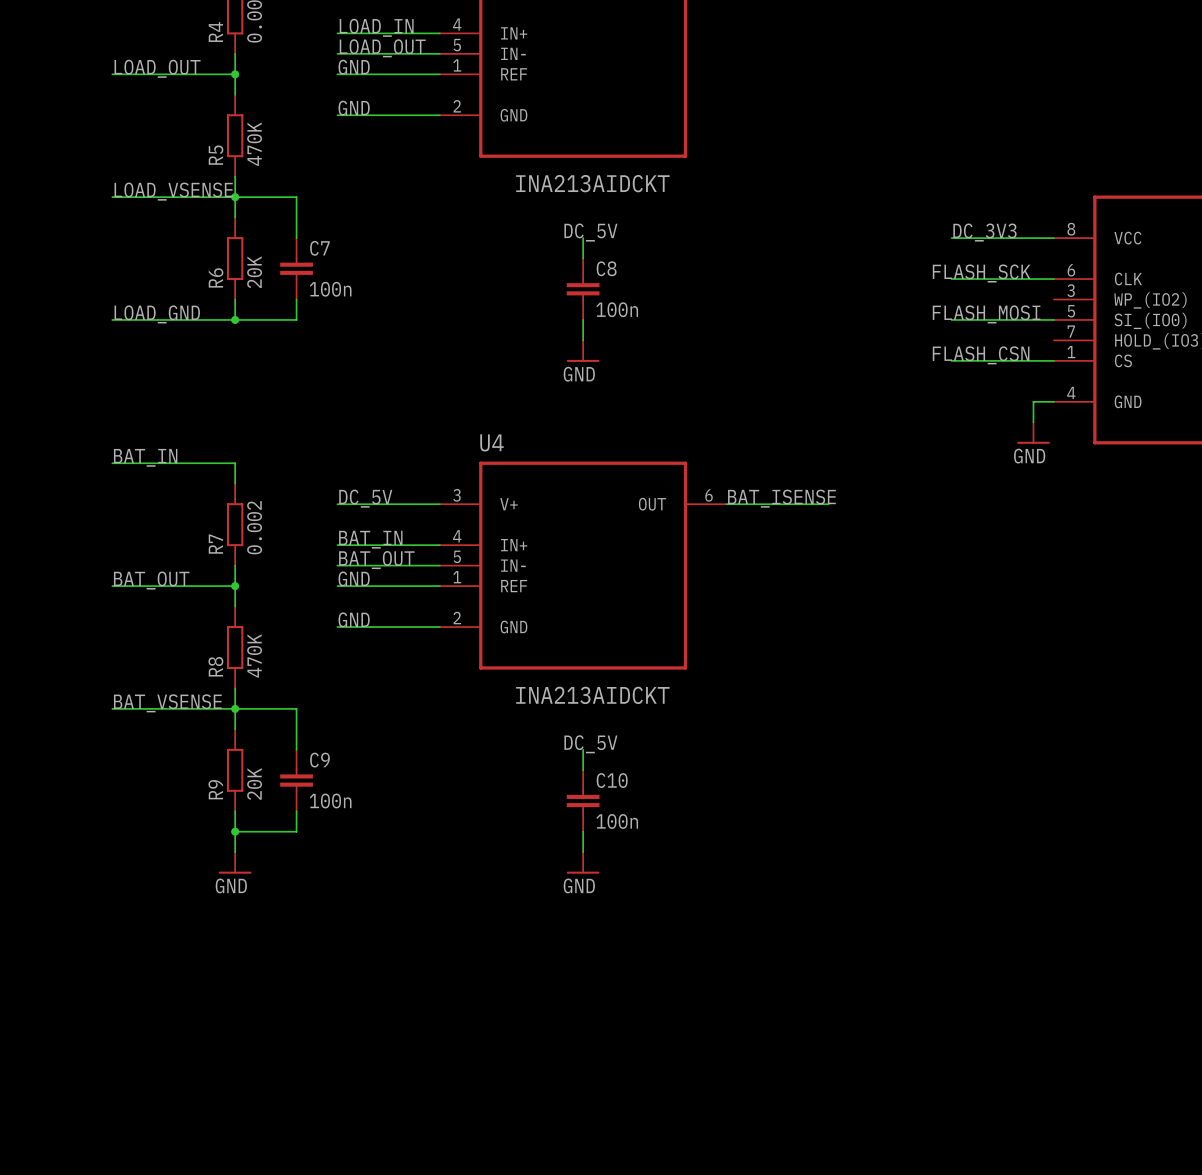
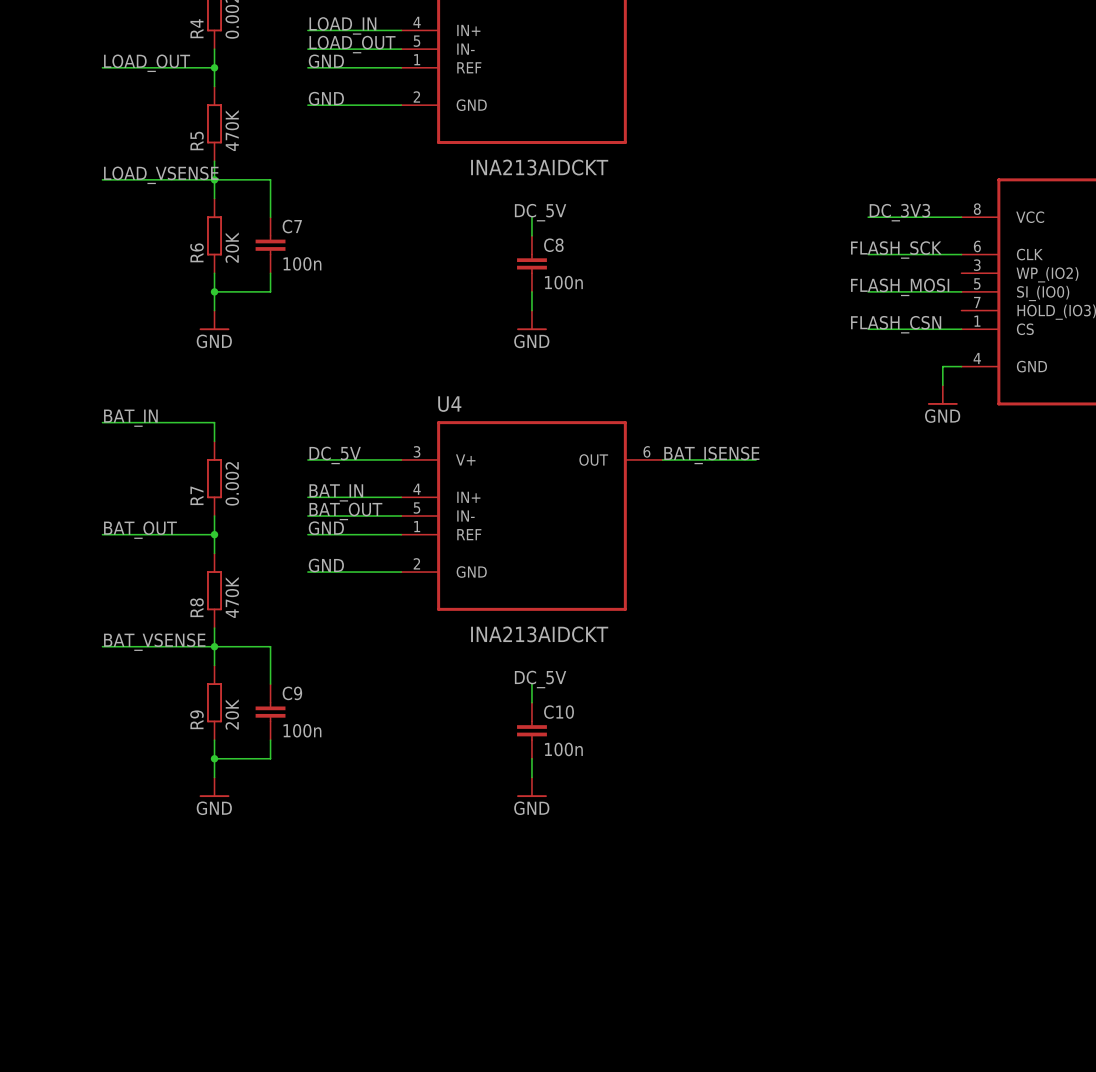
label: LOAD_GND (157, 314) -> none
wire: (112, 319) (235, 319) -> (214, 310) (214, 291)
power symbol: none -> GND (214, 320)

